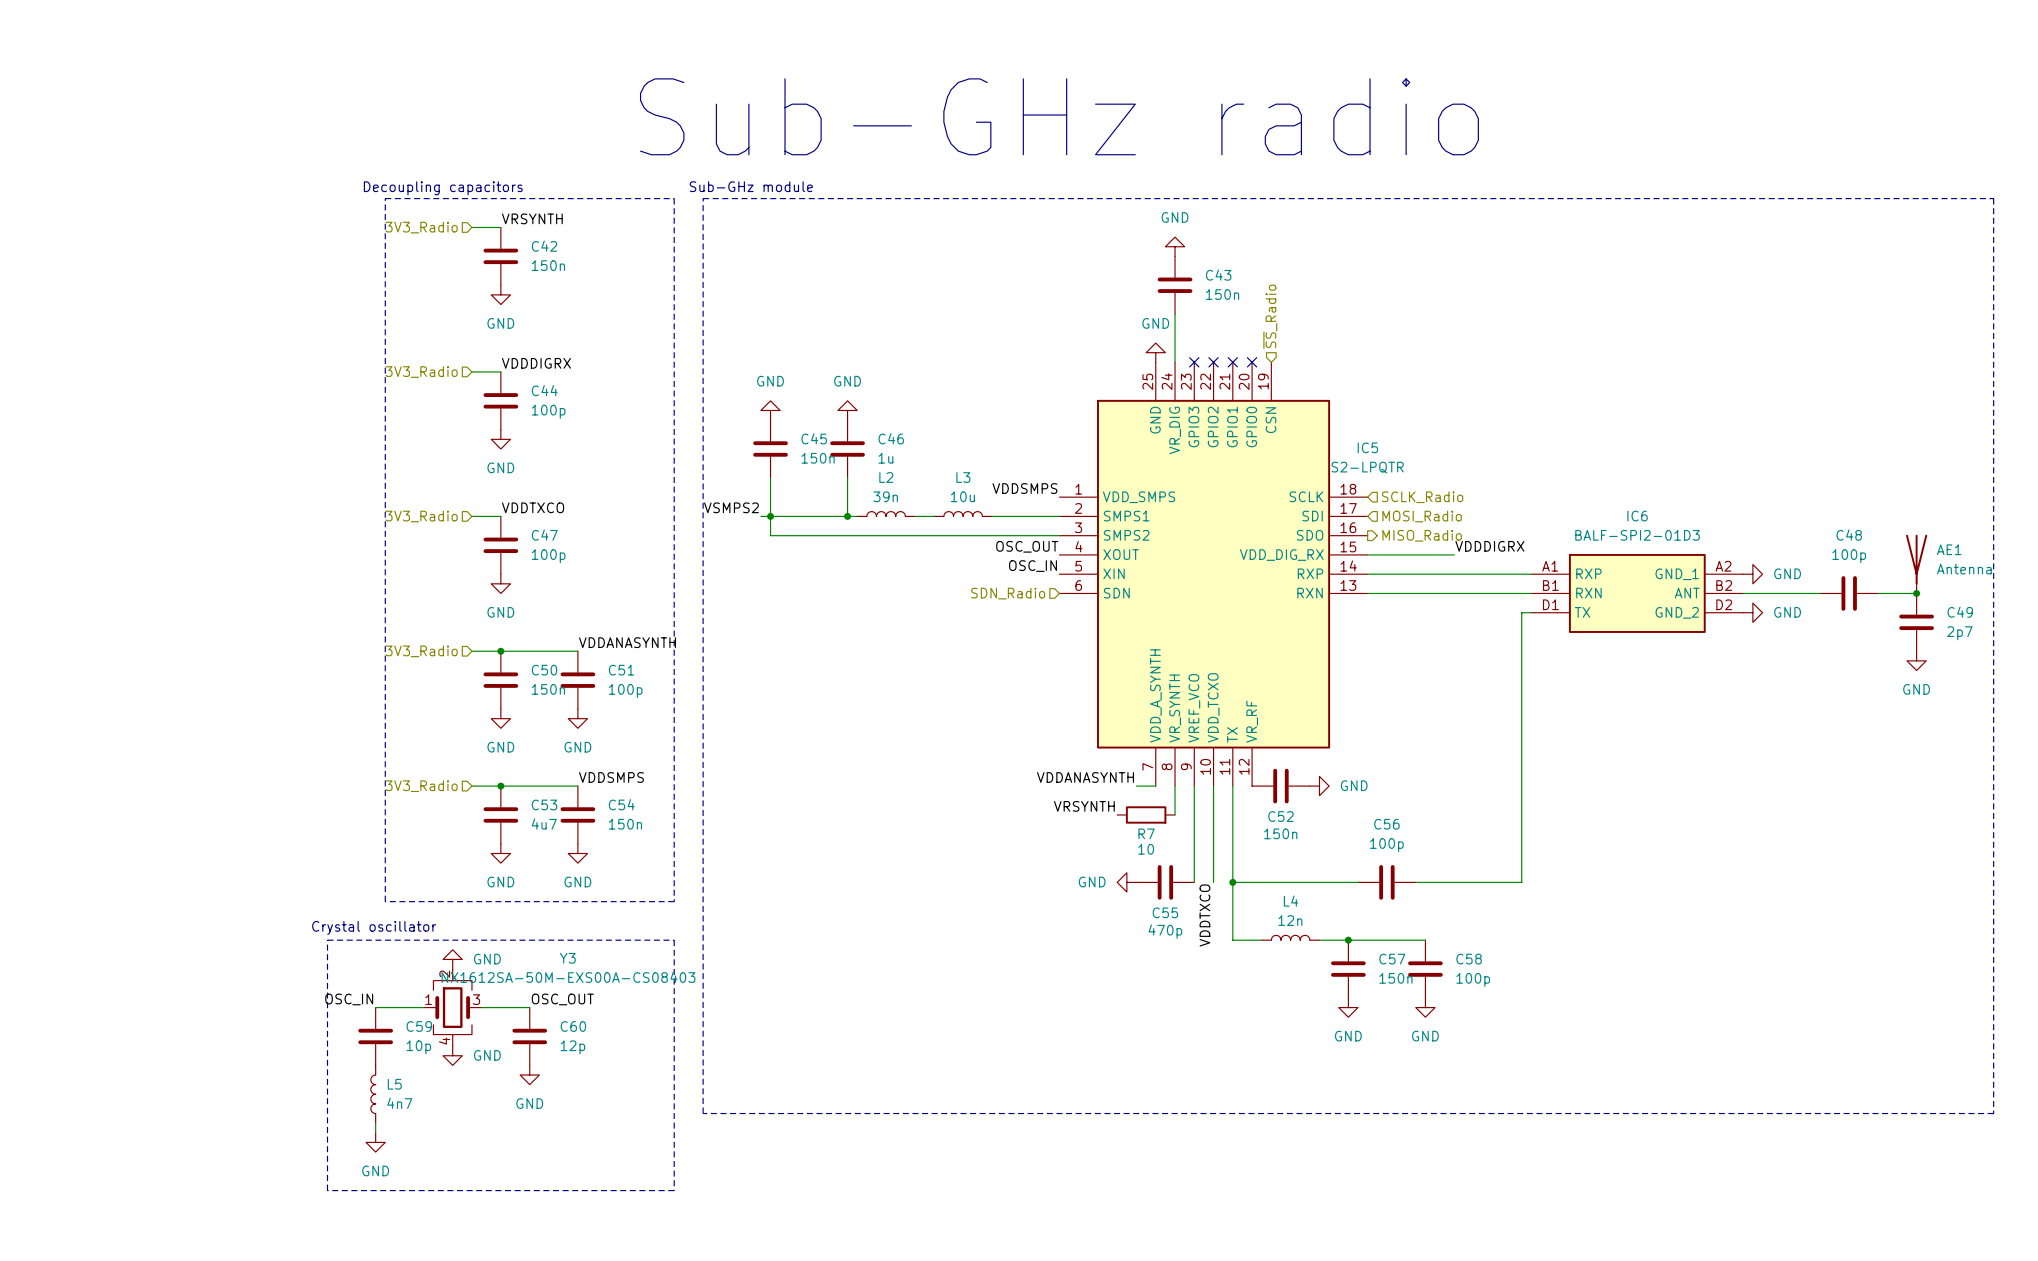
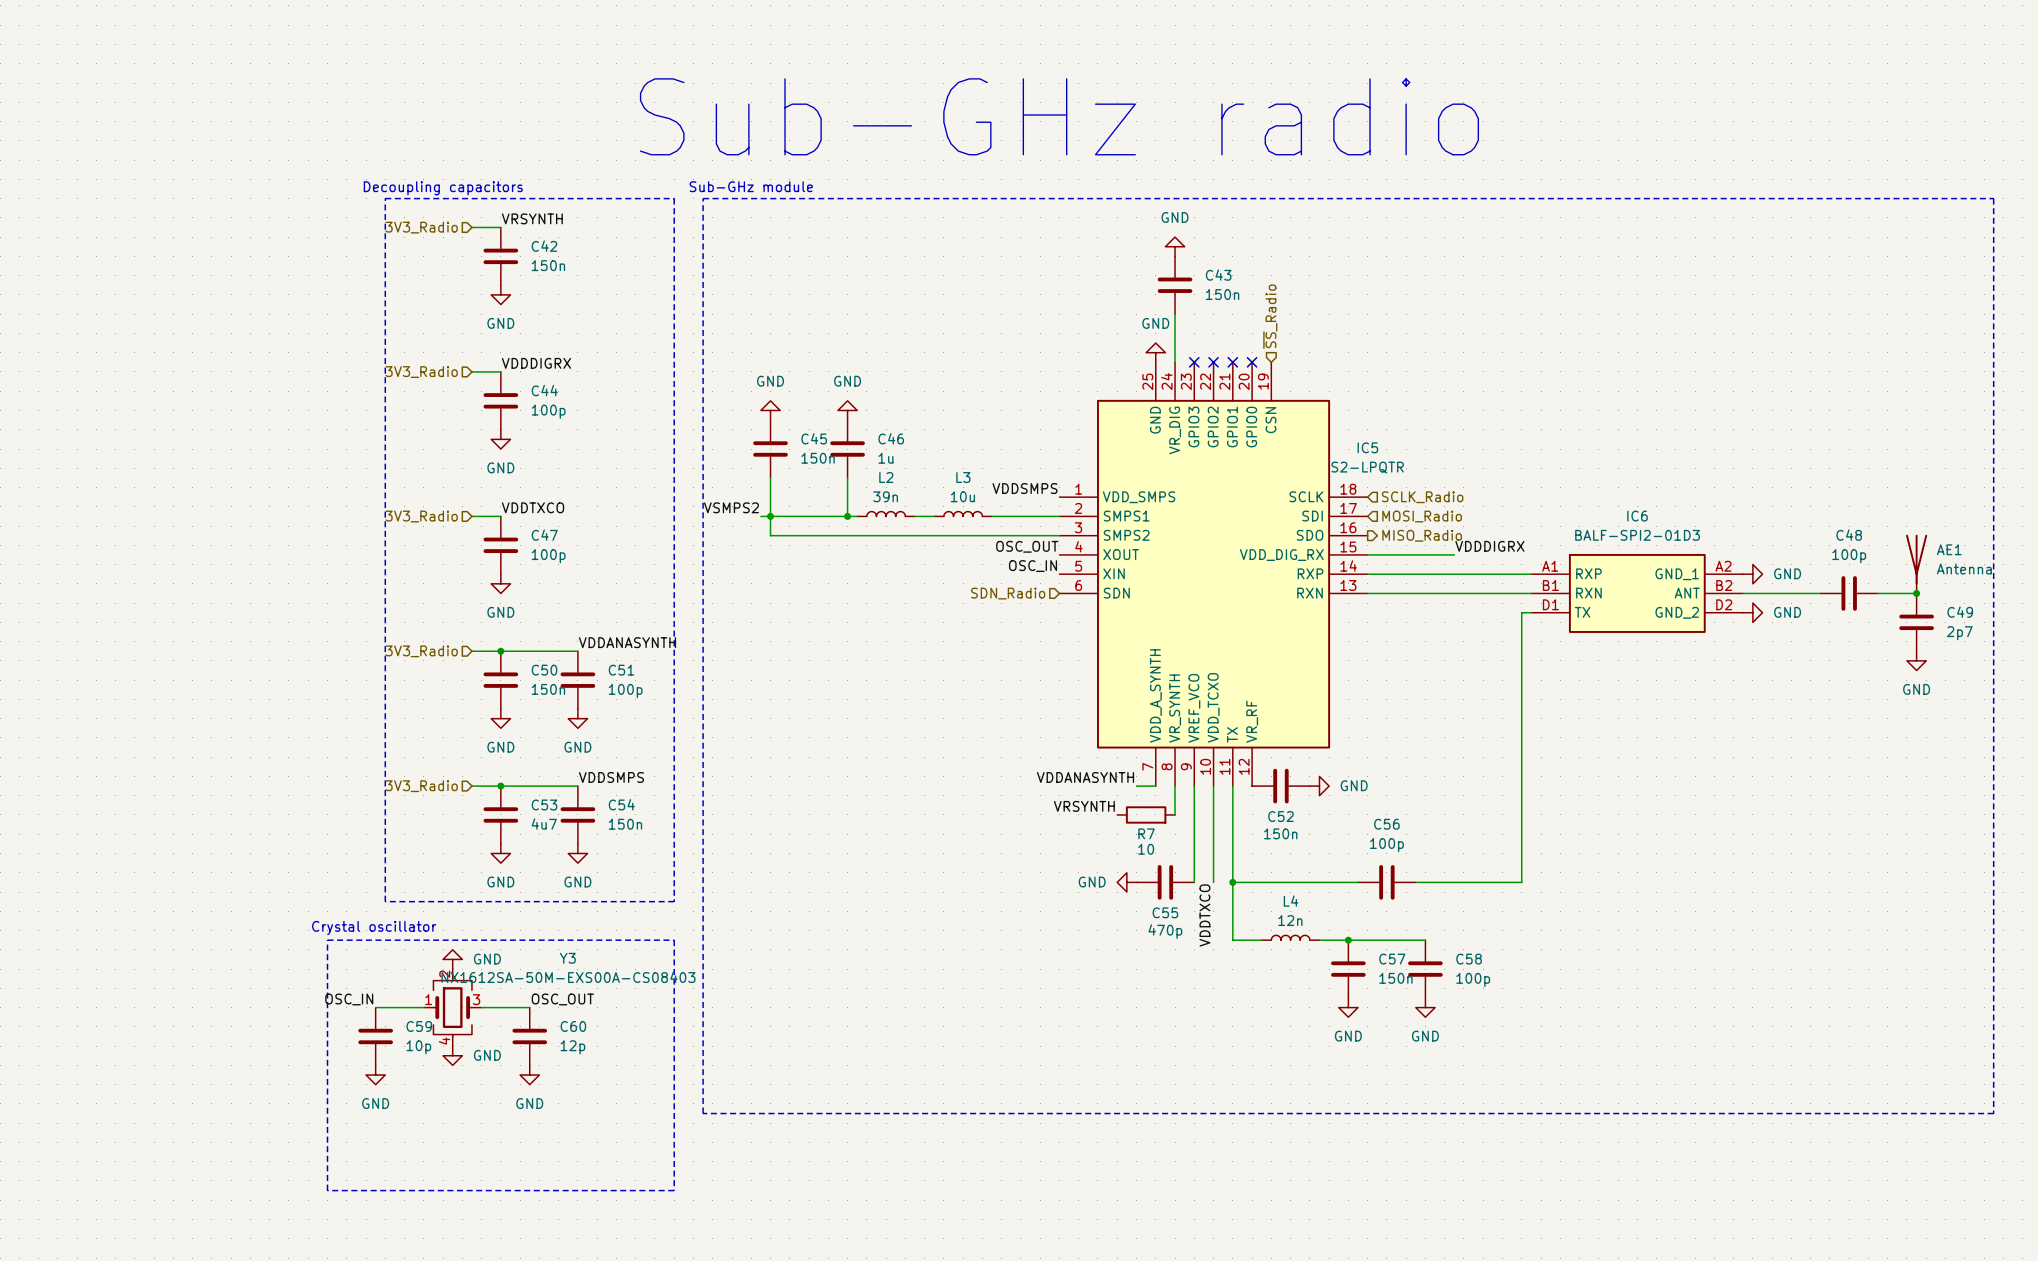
L5: 4n7 (373, 1094) -> none
wire: (375, 1123) (375, 1132) -> none
power symbol position: GND (375, 1142) -> GND (375, 1075)

